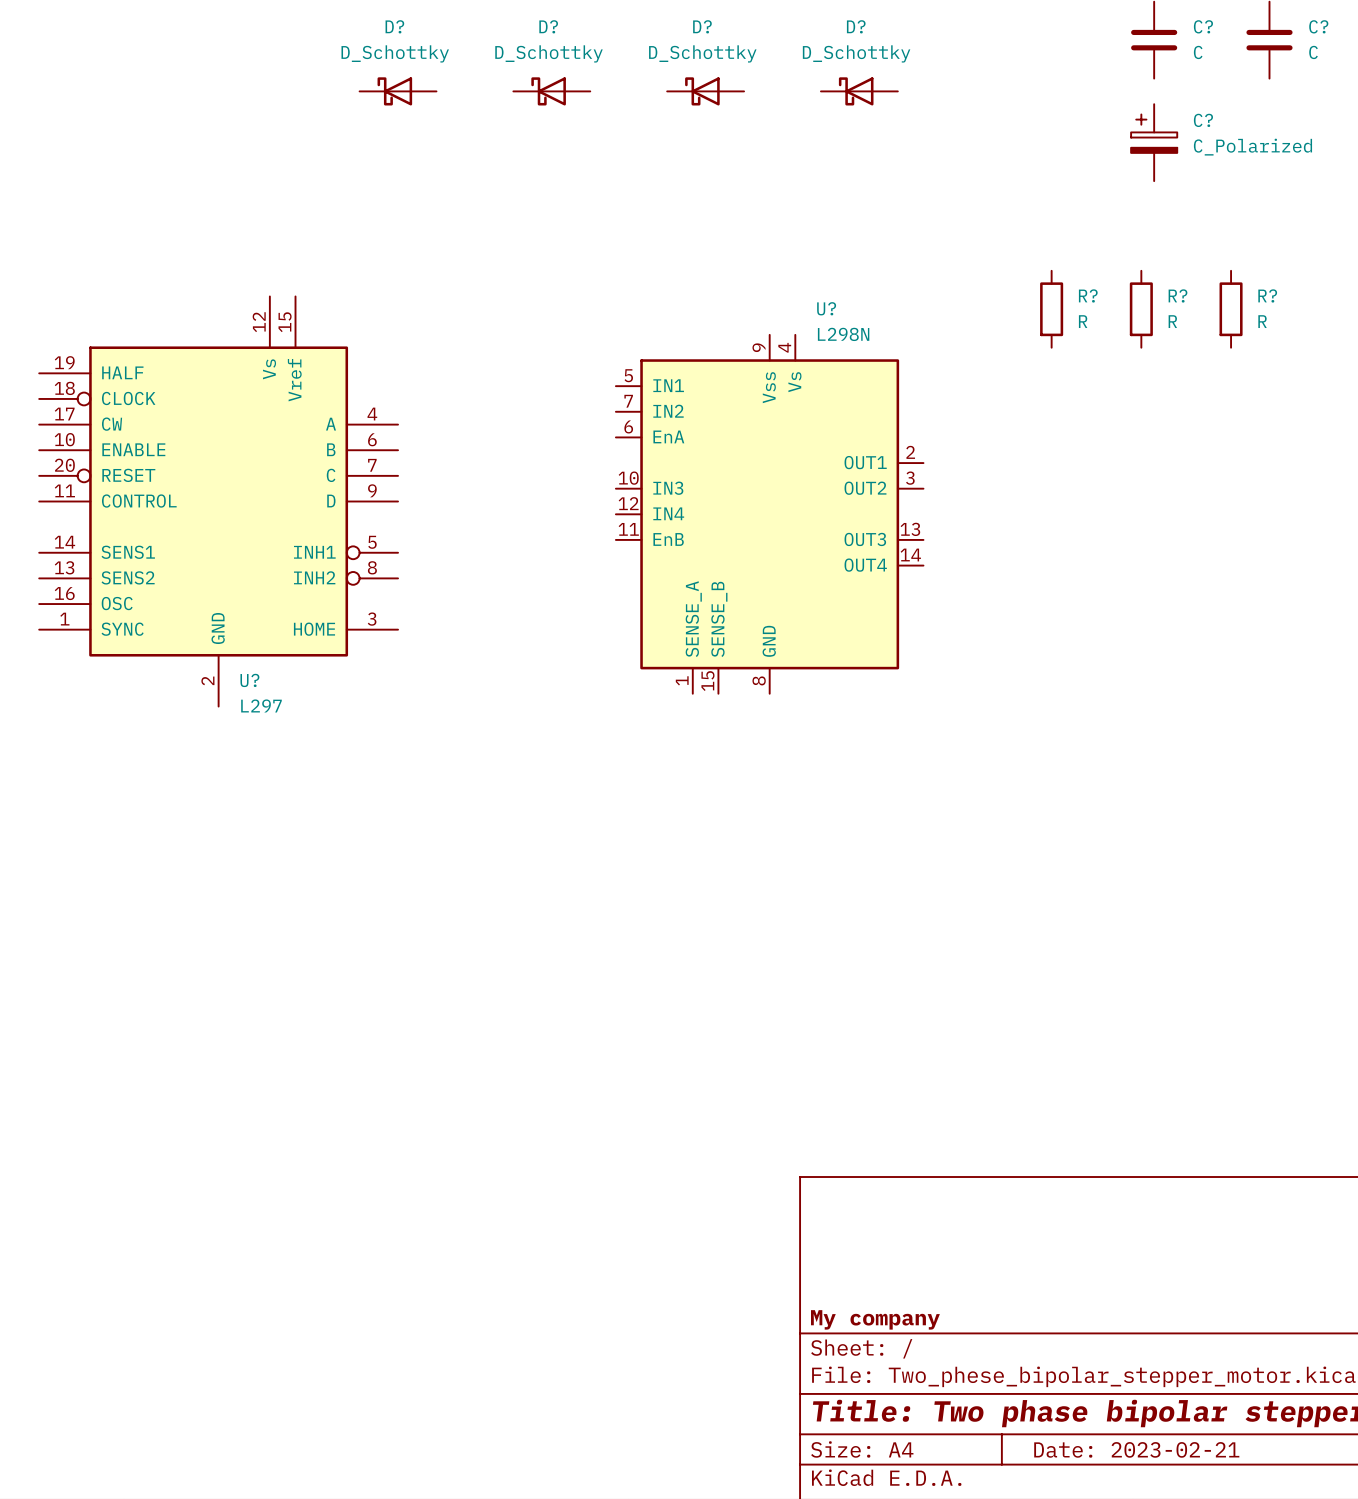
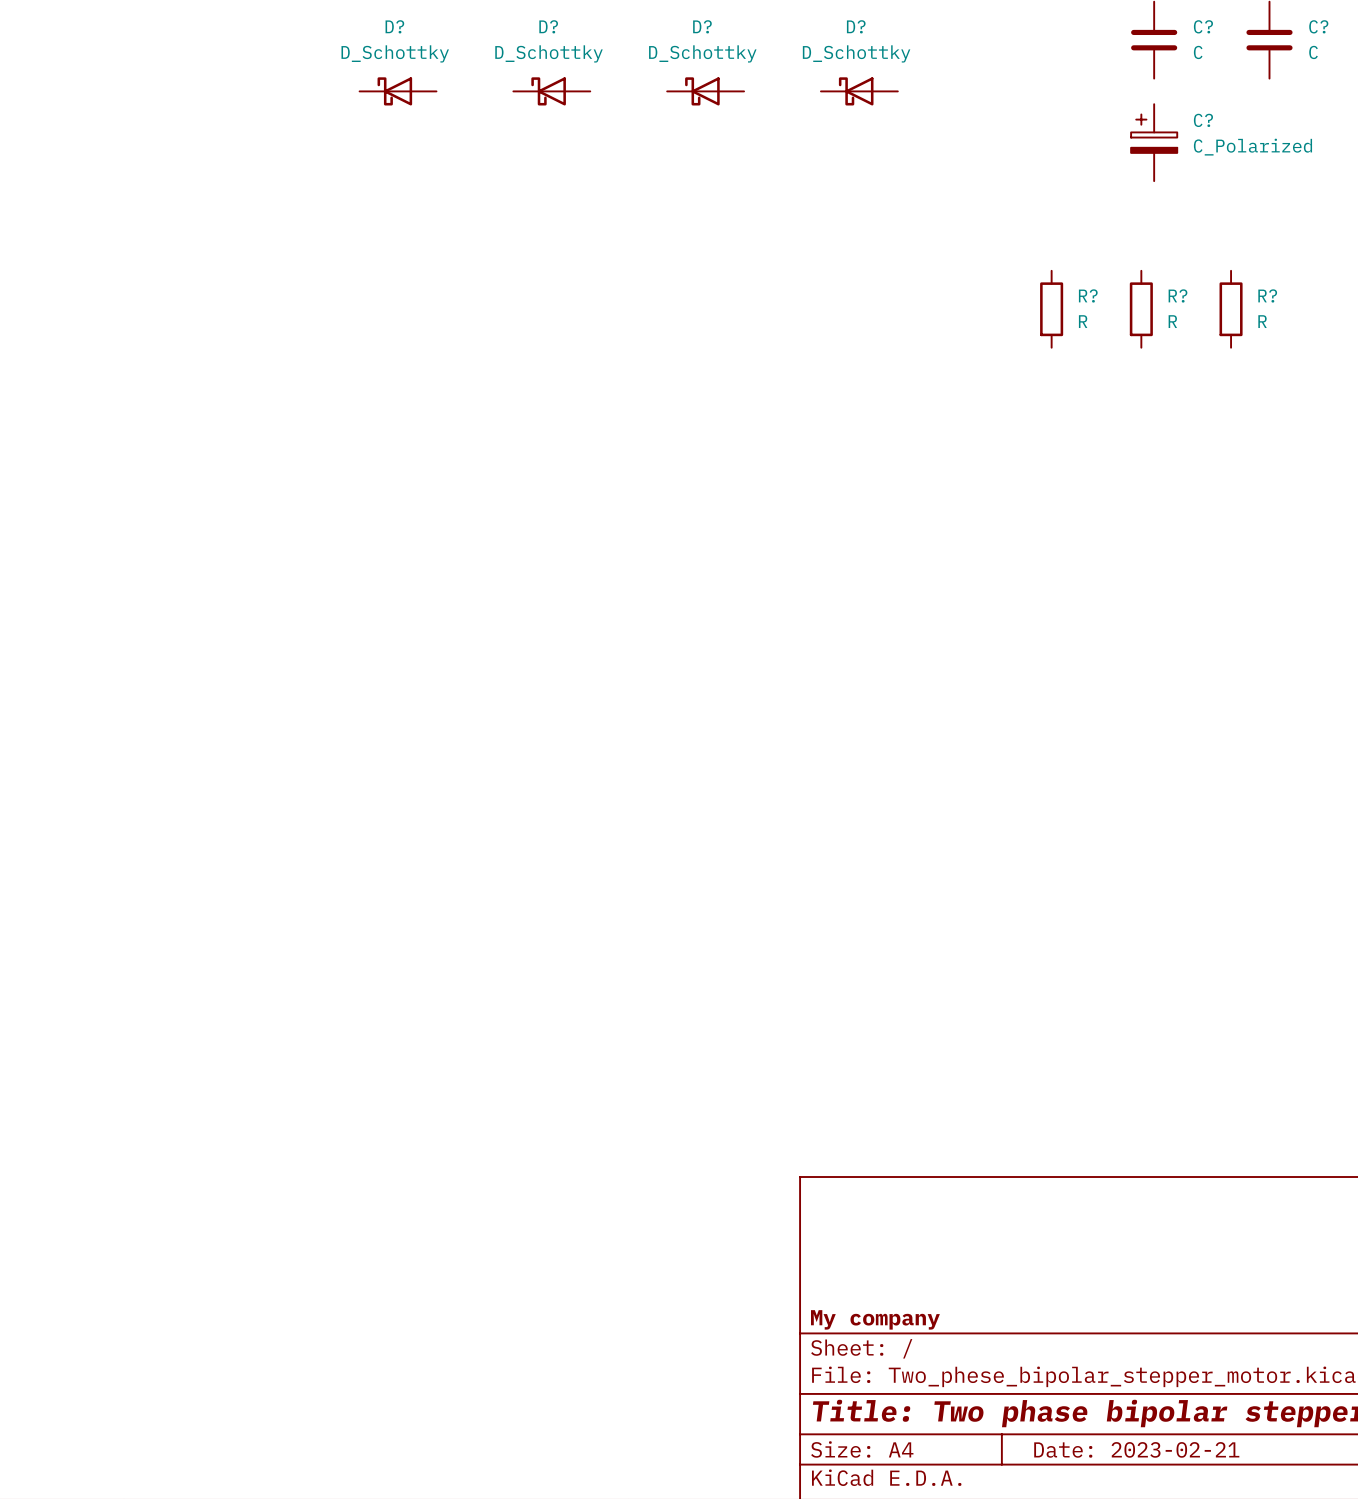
U?: L297 (218, 501) -> none
U?: L298N (769, 514) -> none

